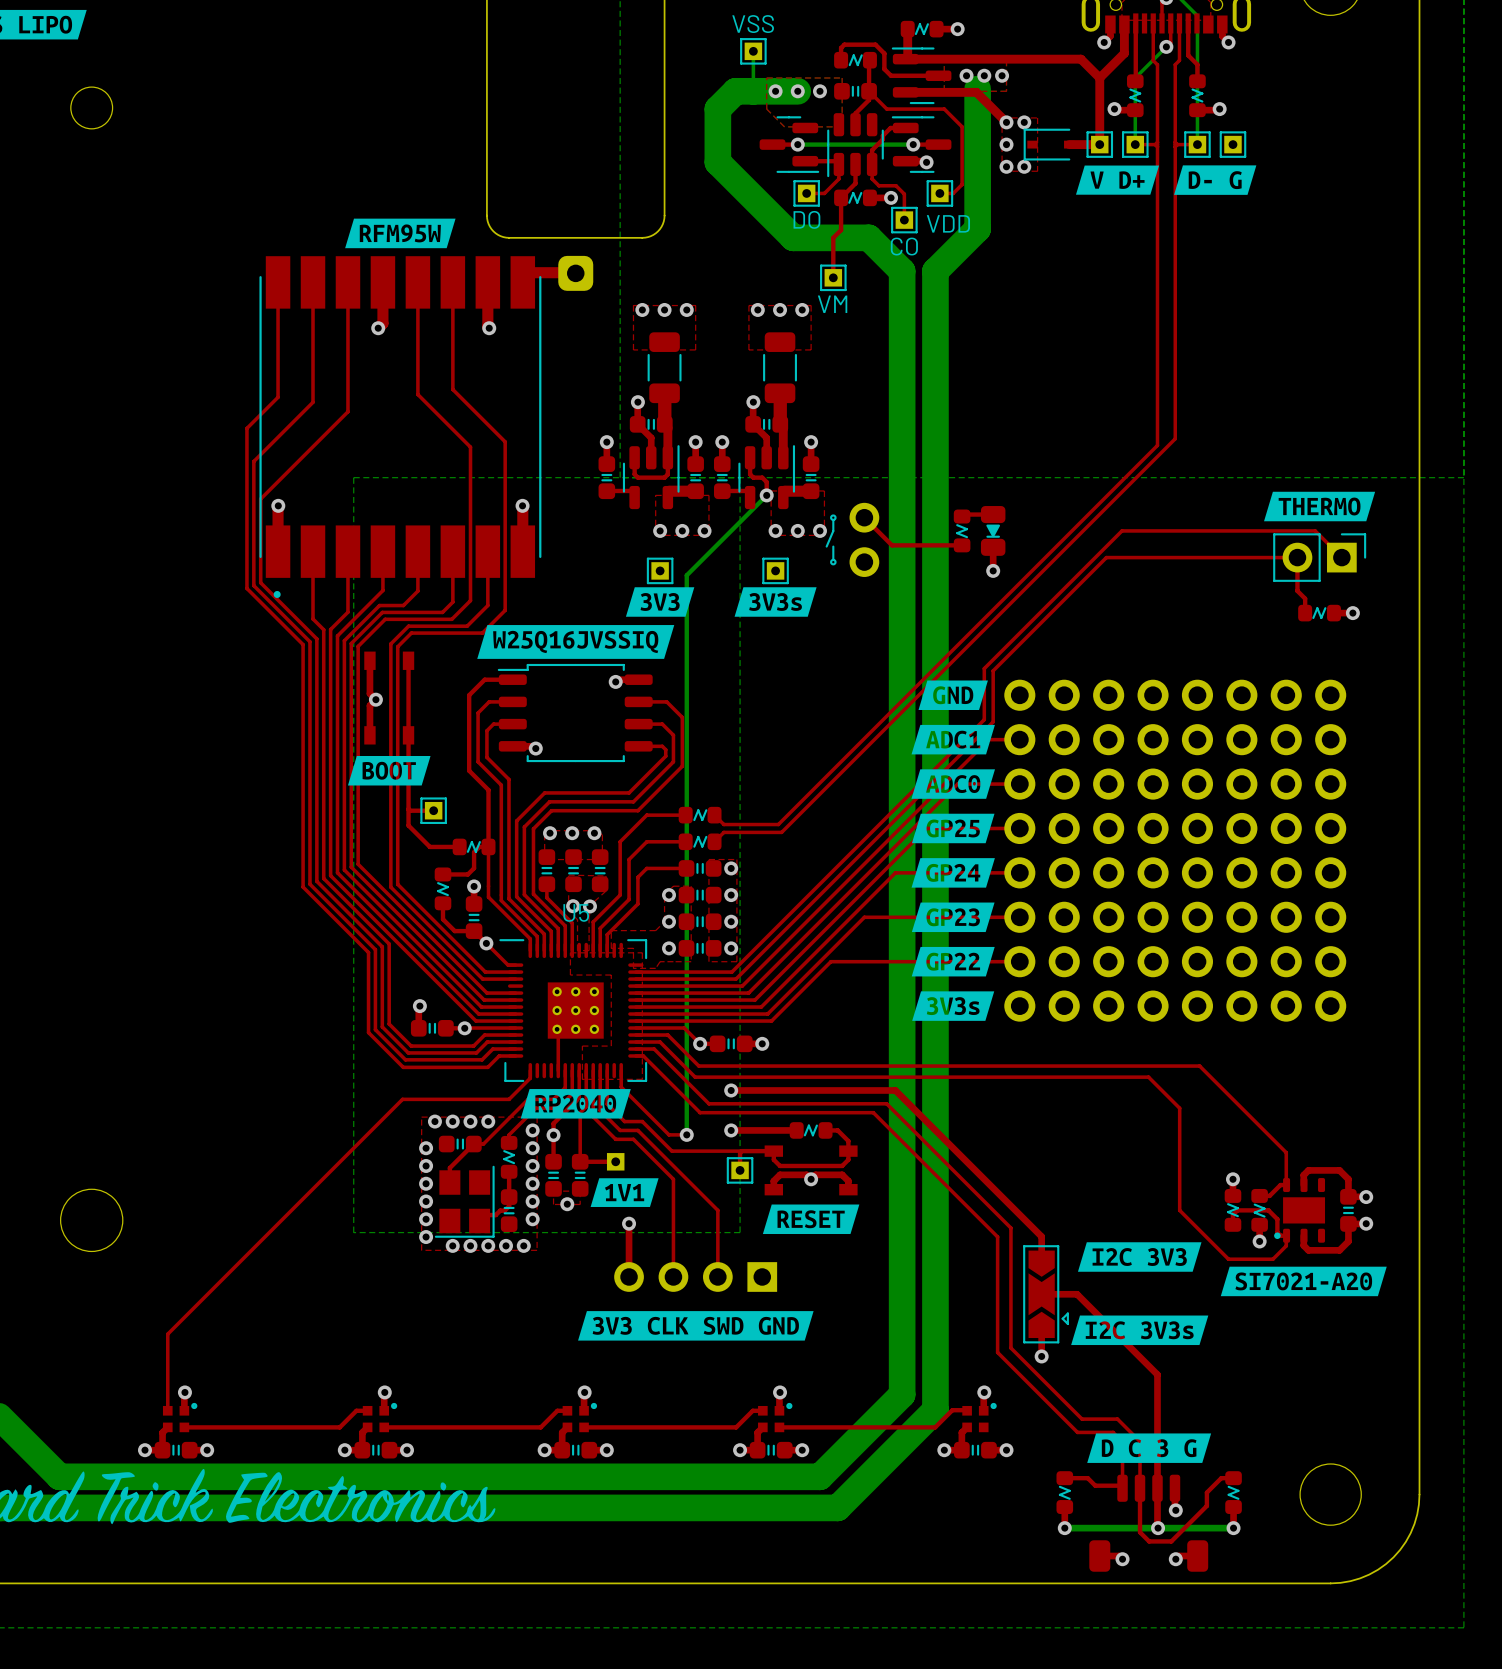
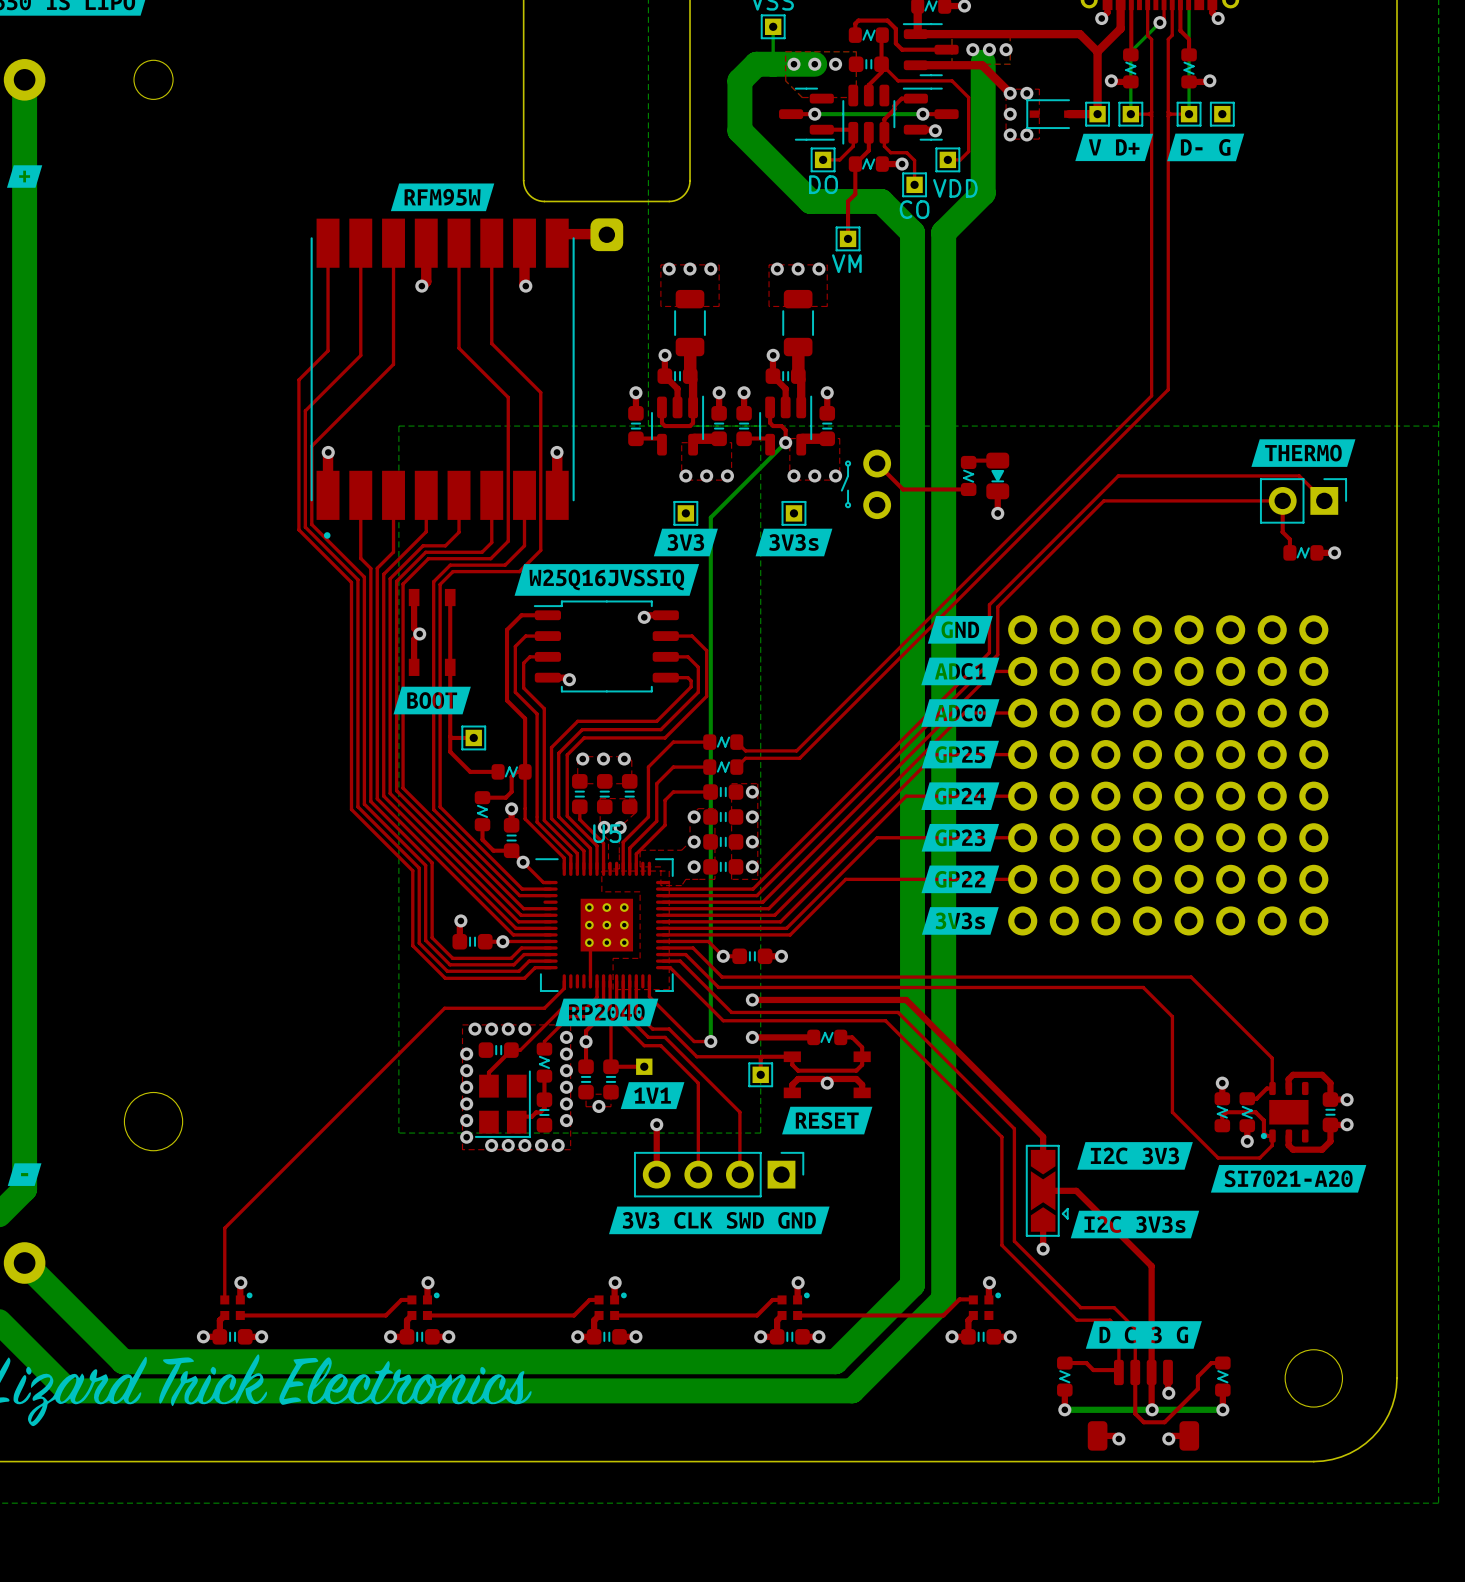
part footprint: [614, 1262, 778, 1292] -> [633, 1151, 805, 1198]

